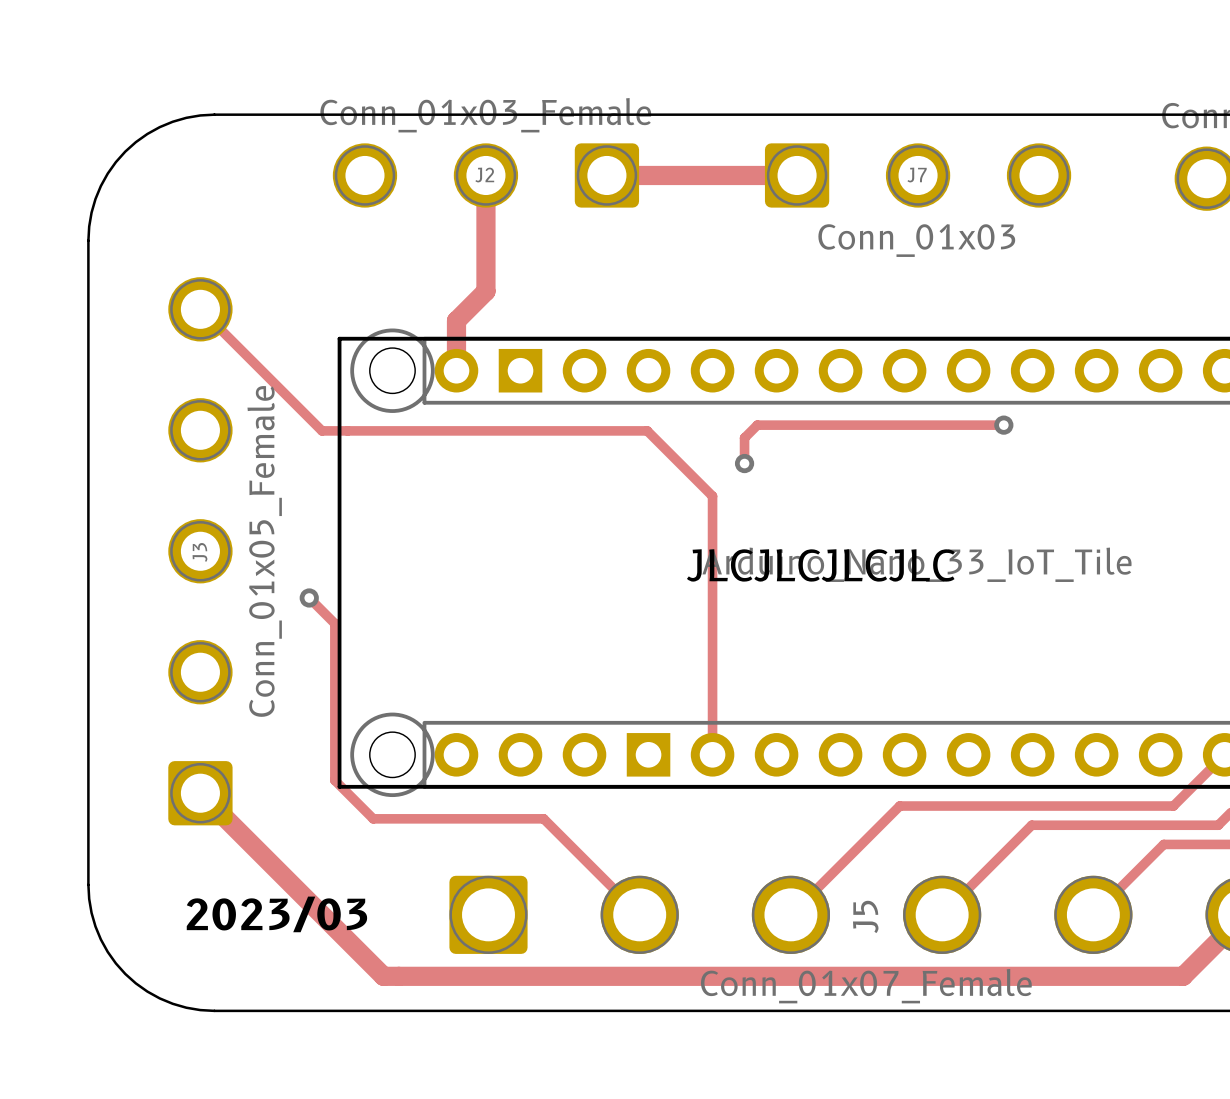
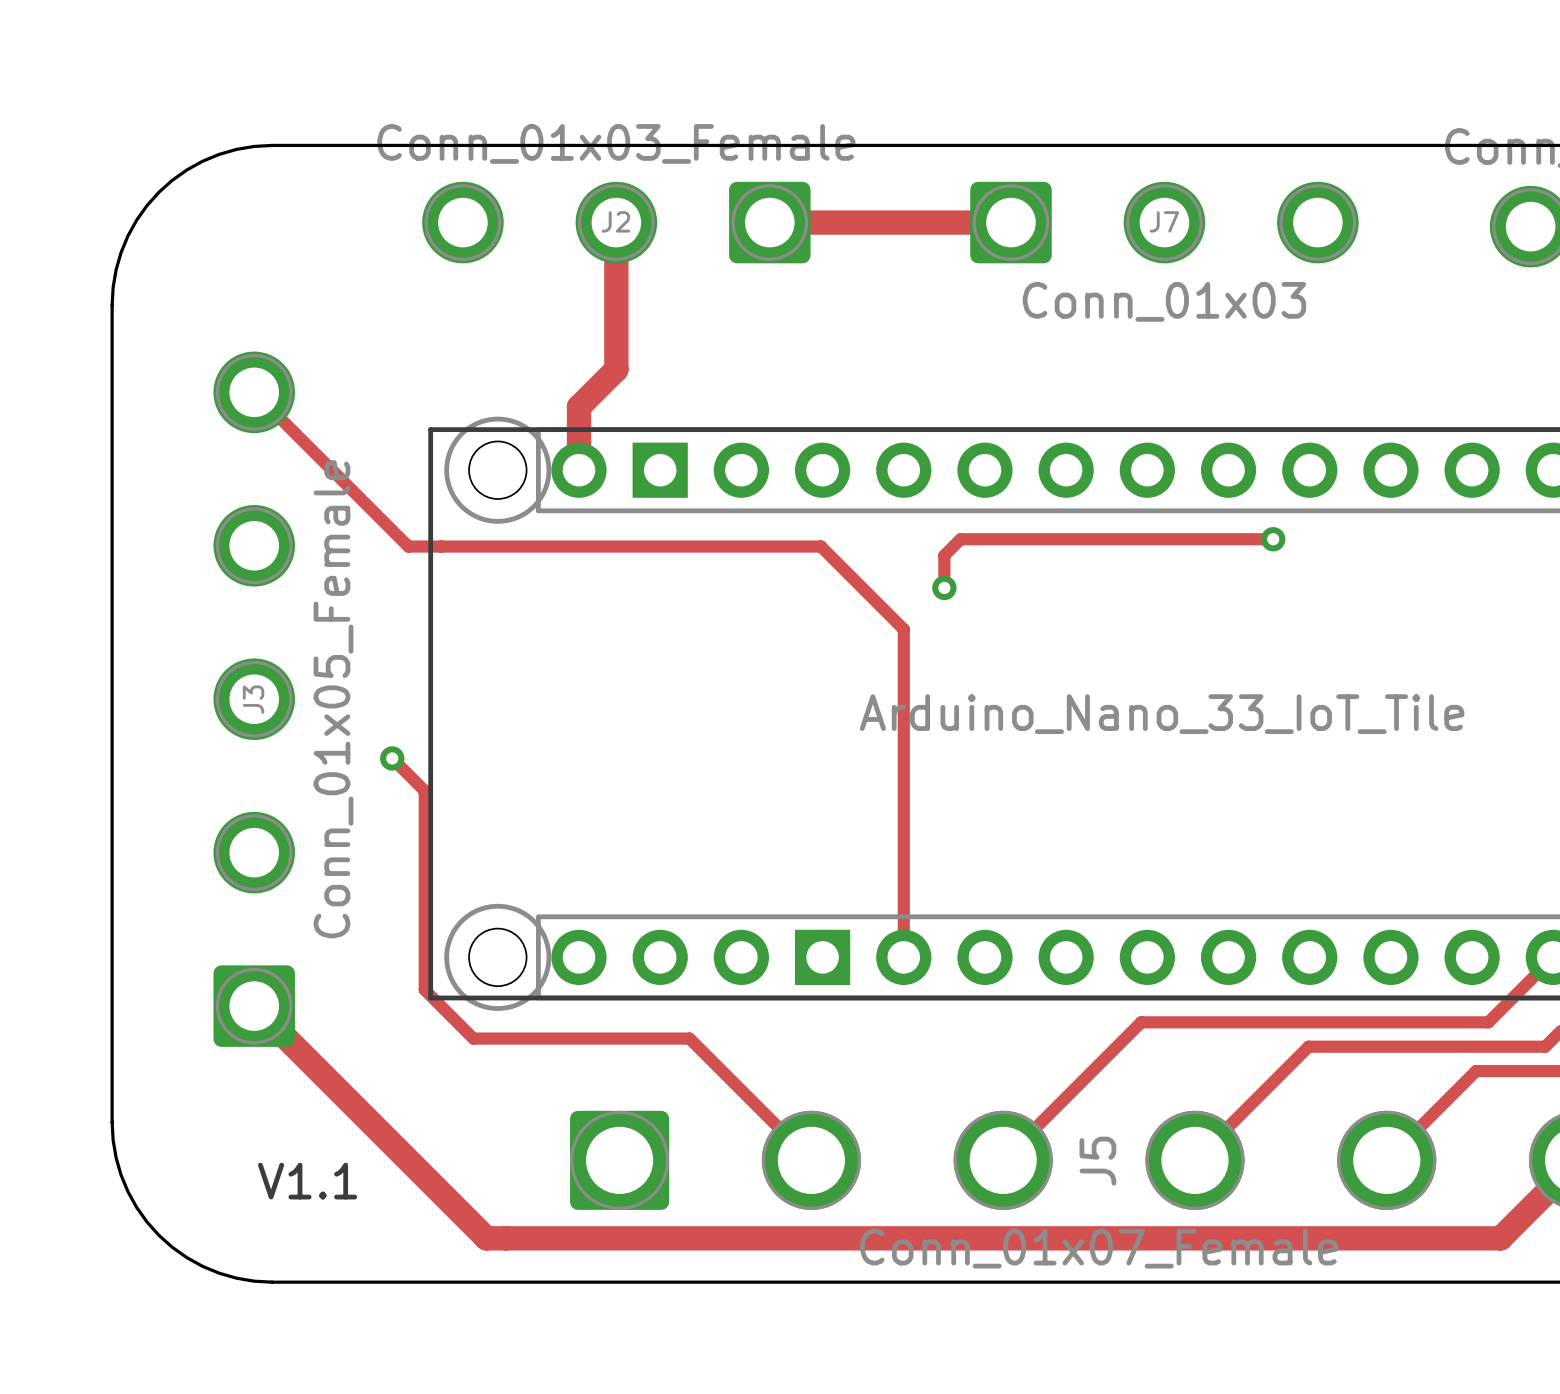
text: JLCJLCJLCJLC (820, 565) -> none
text: 2023/03 (276, 914) -> V1.1 (307, 1181)

